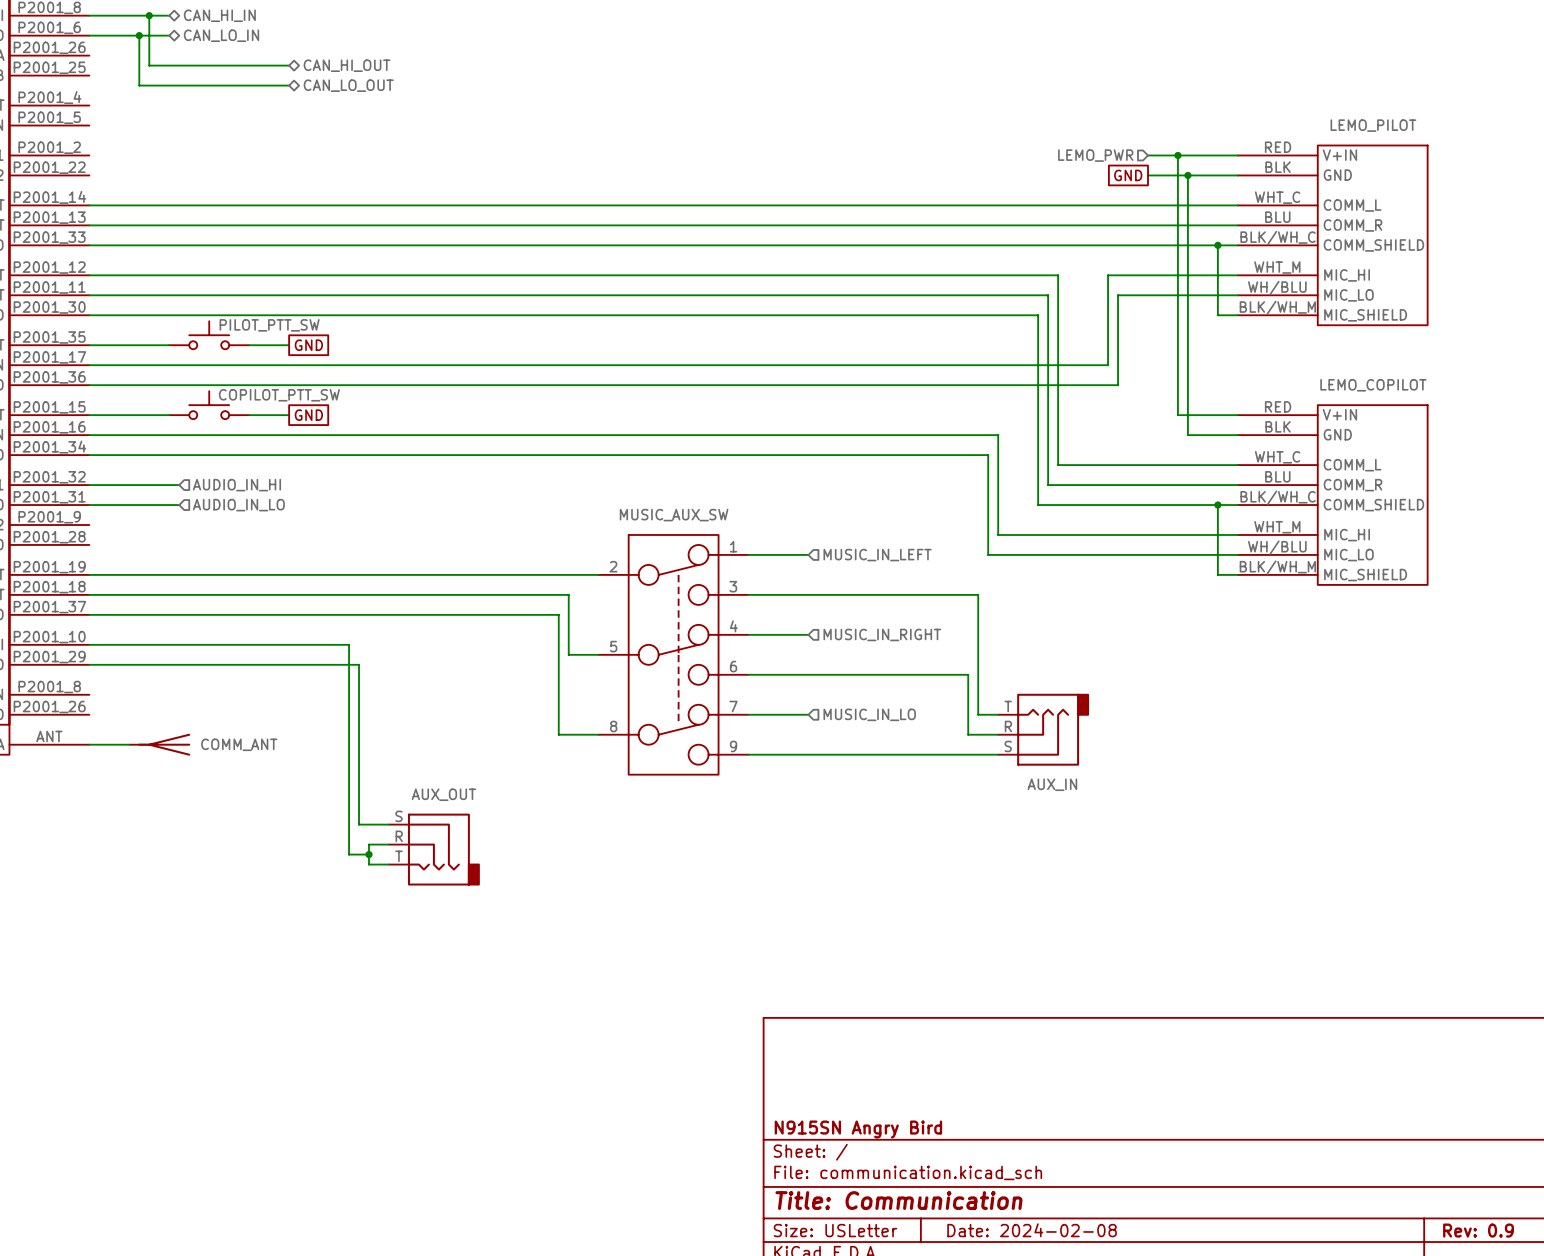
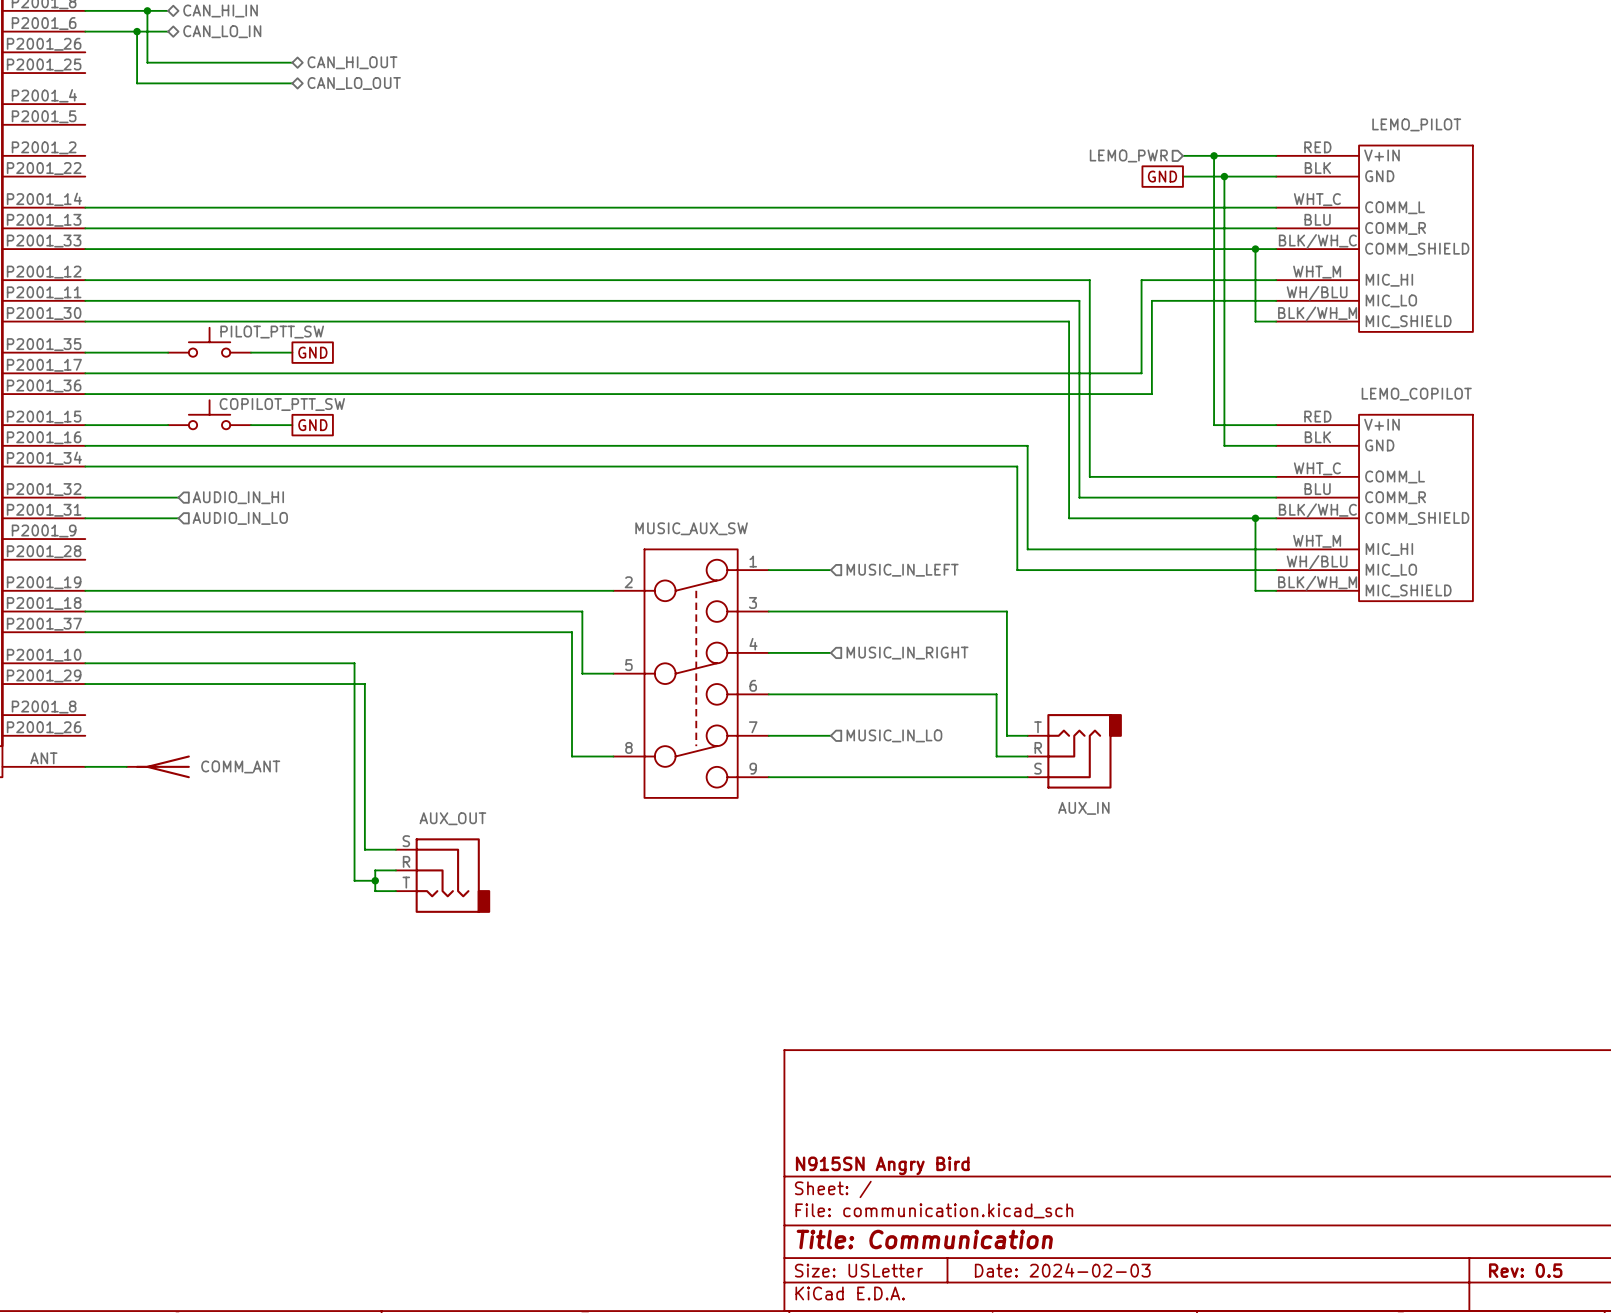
title block: Date: 2024-02-08 (1032, 1230) -> Date: 2024-02-03 (1062, 1270)
title block: Rev: 0.9 (1478, 1230) -> Rev: 0.5 (1525, 1270)

